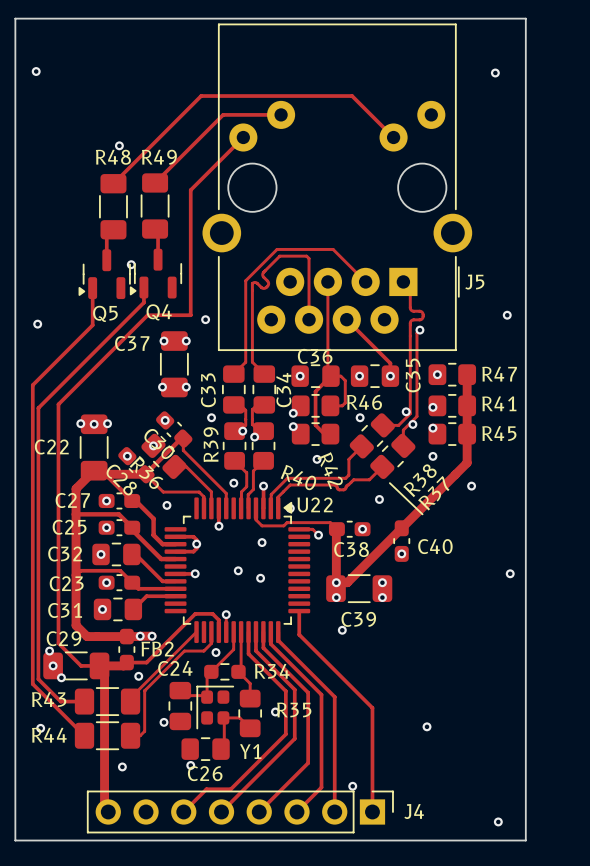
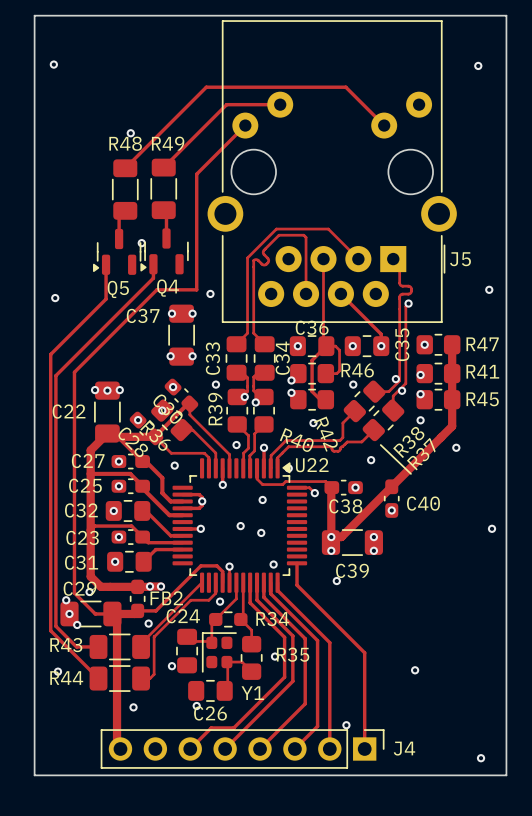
via: none -> (273, 564)
via: none -> (89, 592)

